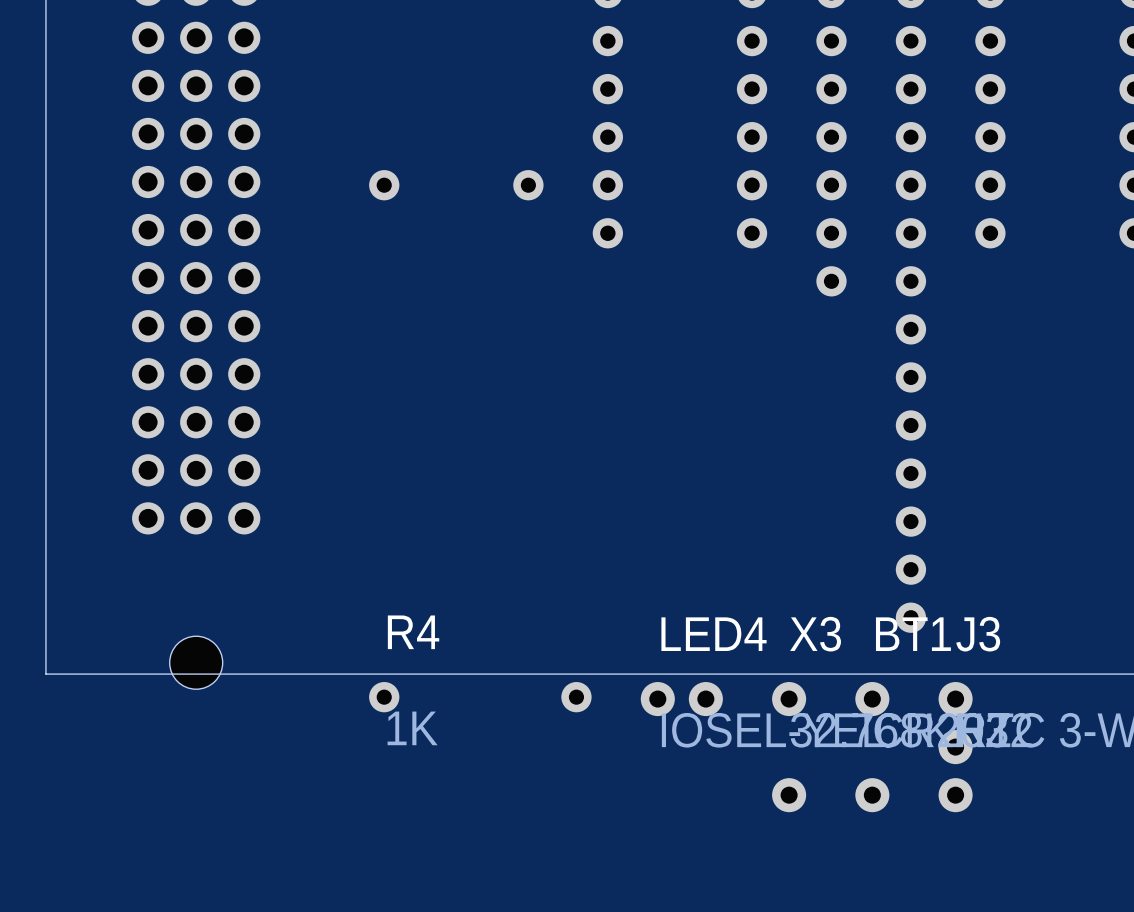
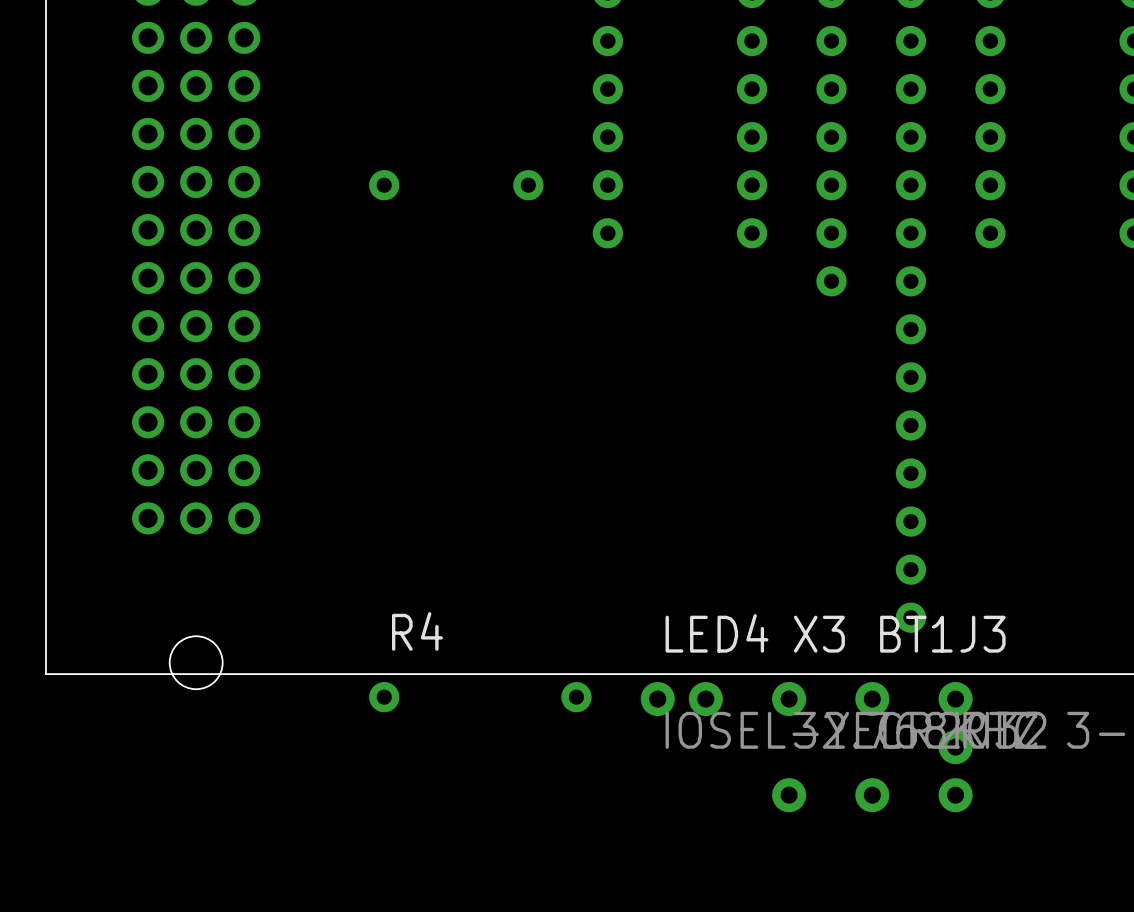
R4 value: 1K (412, 728) -> none

